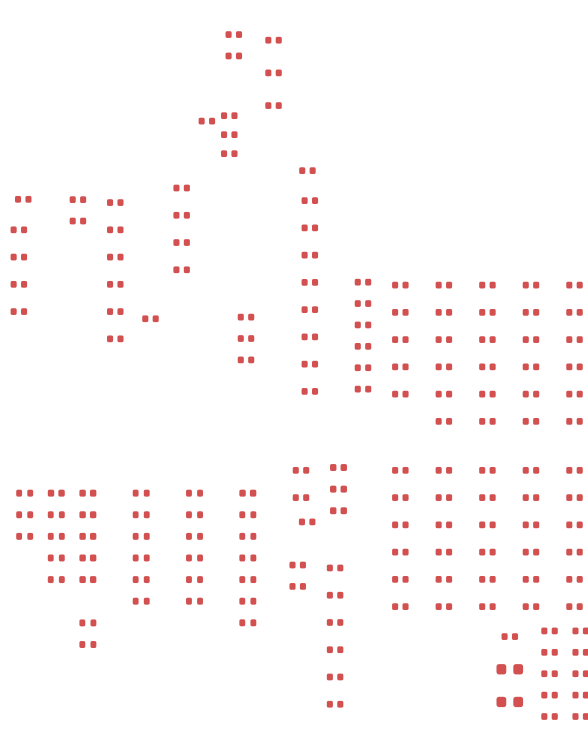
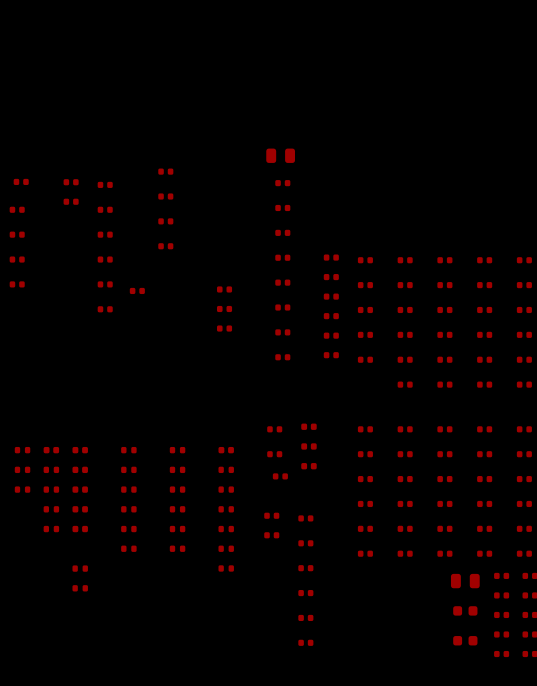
part: (233, 34) -> none
part: (273, 40) -> none
part: (233, 55) -> none
part: (273, 72) -> none
part: (273, 105) -> none
part: (229, 115) -> none
part: (206, 121) -> none
part: (229, 134) -> none
part: (229, 153) -> none
part footprint: [299, 167, 316, 175] -> [266, 148, 296, 163]
part footprint: [501, 633, 519, 640] -> [450, 573, 480, 589]

